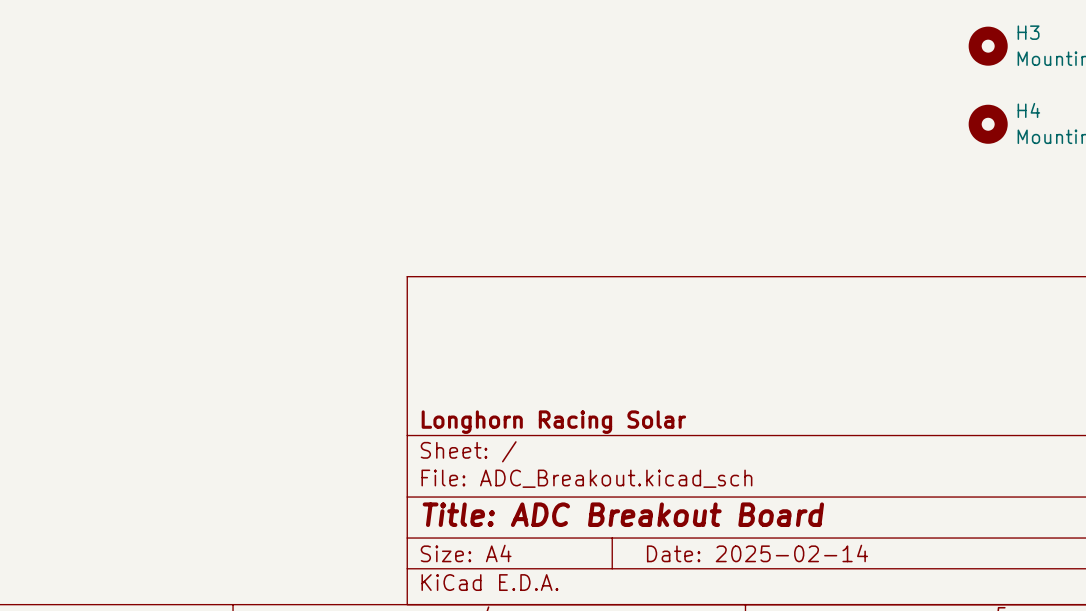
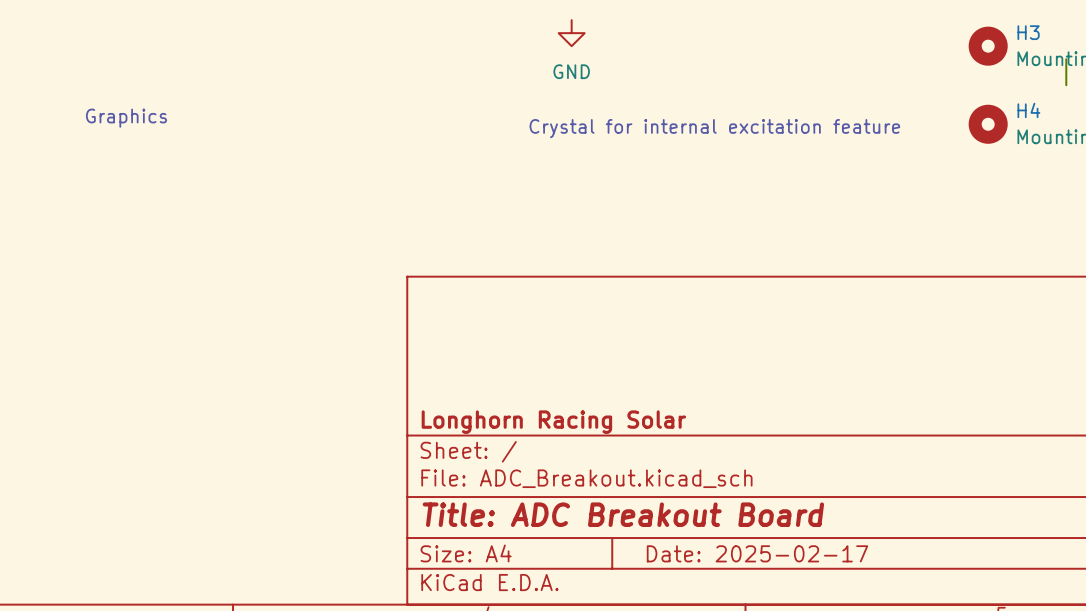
power symbol: none -> GND (571, 33)
wire: none -> (1066, 59) (1066, 85)
text: none -> Graphics (126, 118)
text: none -> Crystal for internal excitation feature (714, 128)
title block: Date: 2025-02-14 (757, 553) -> Date: 2025-02-17 (757, 553)

